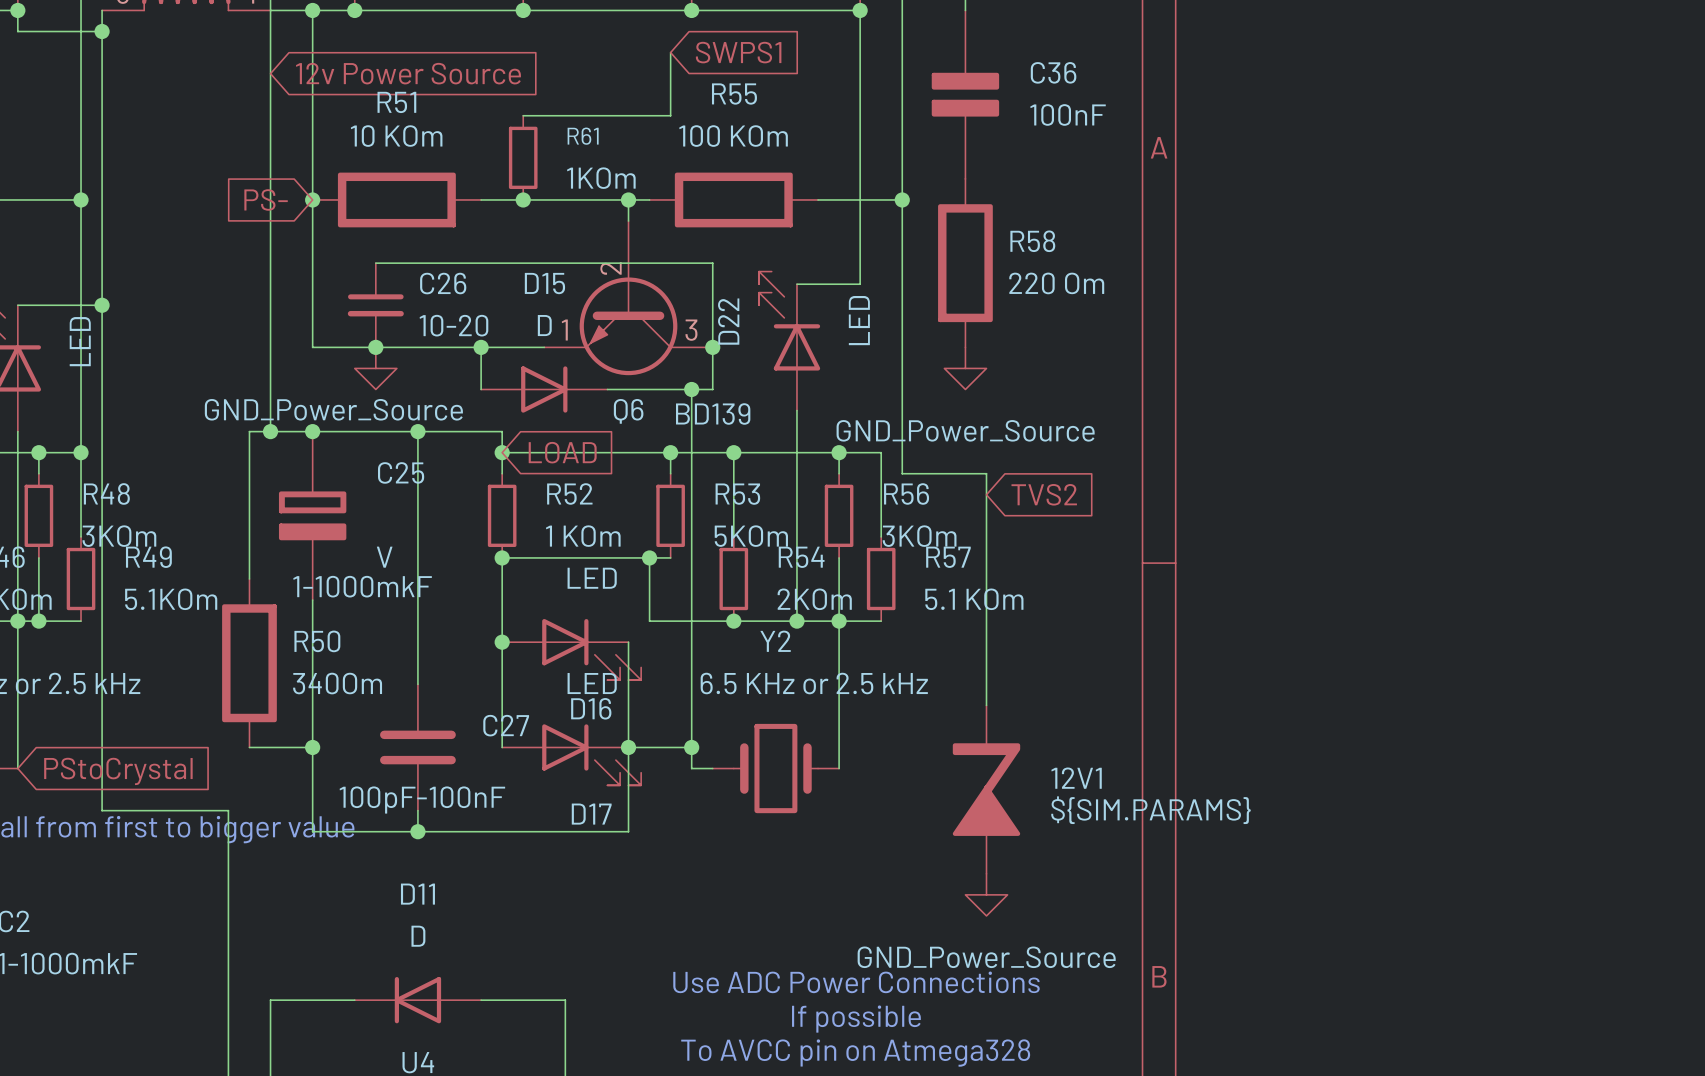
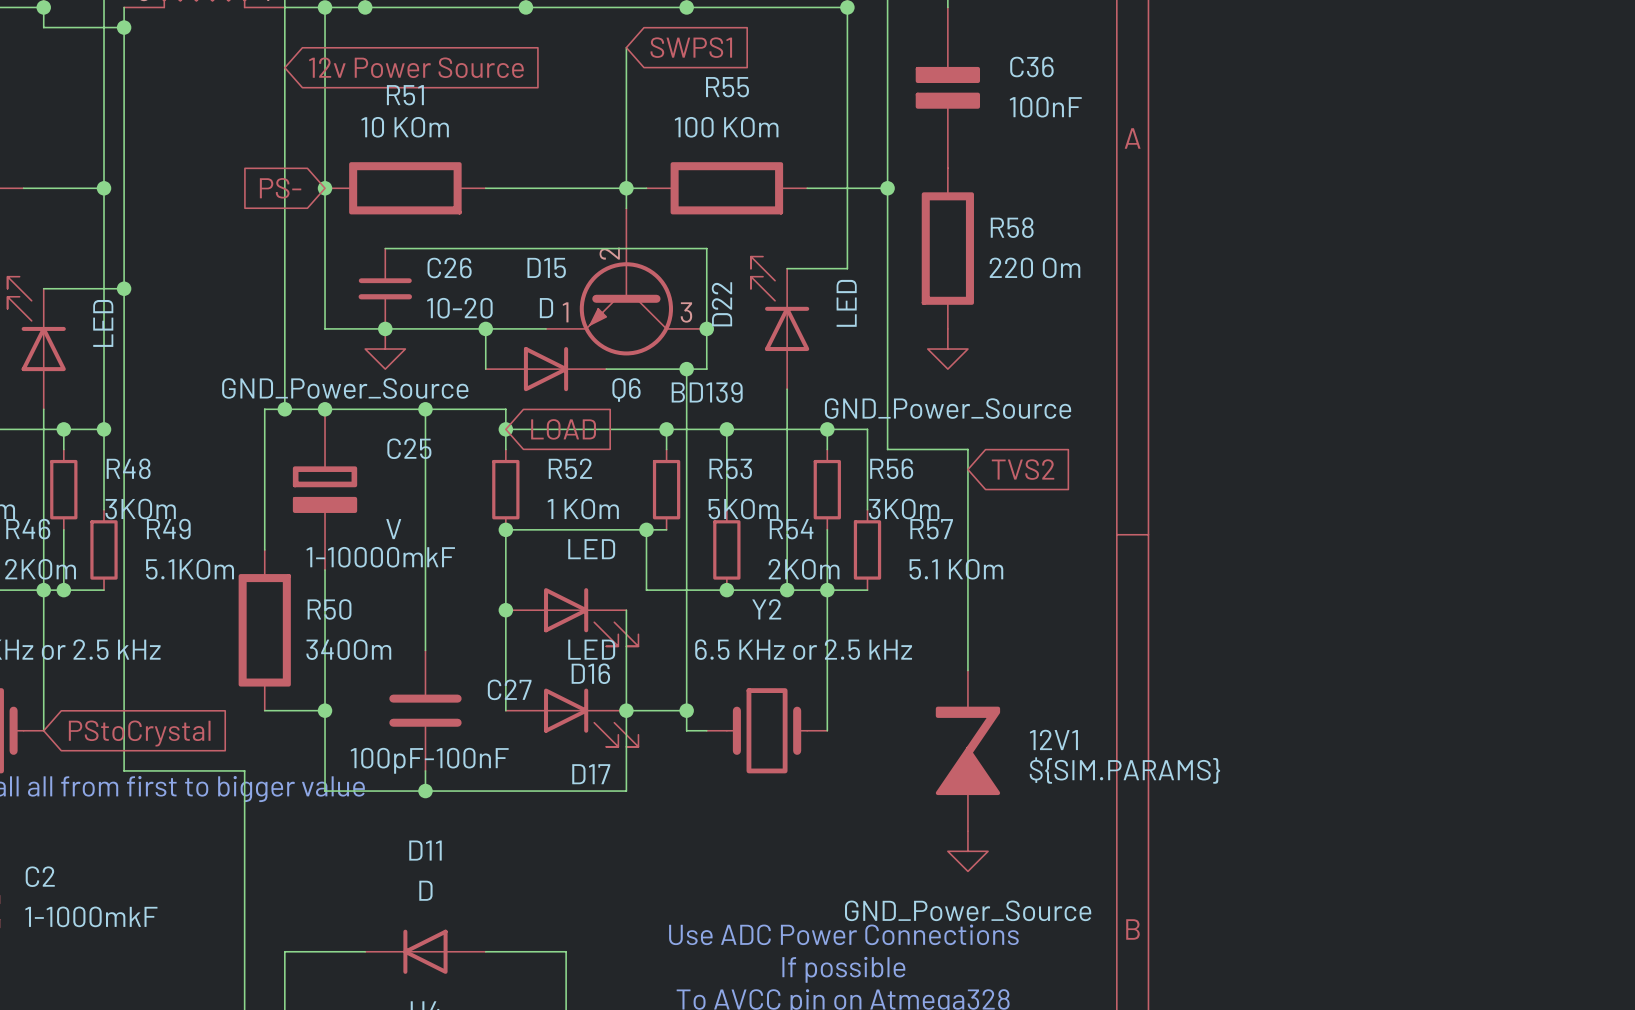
wire: none -> (626, 47) (626, 188)
wire: (670, 52) (670, 115) (523, 115) -> none
global label position: SWPS1 (738, 52) -> SWPS1 (691, 47)
R61: 1KOm (523, 157) -> none
junction: (523, 199) -> none
C25 value: 1-1000mkF (362, 586) -> 1-10000mkF (380, 557)

